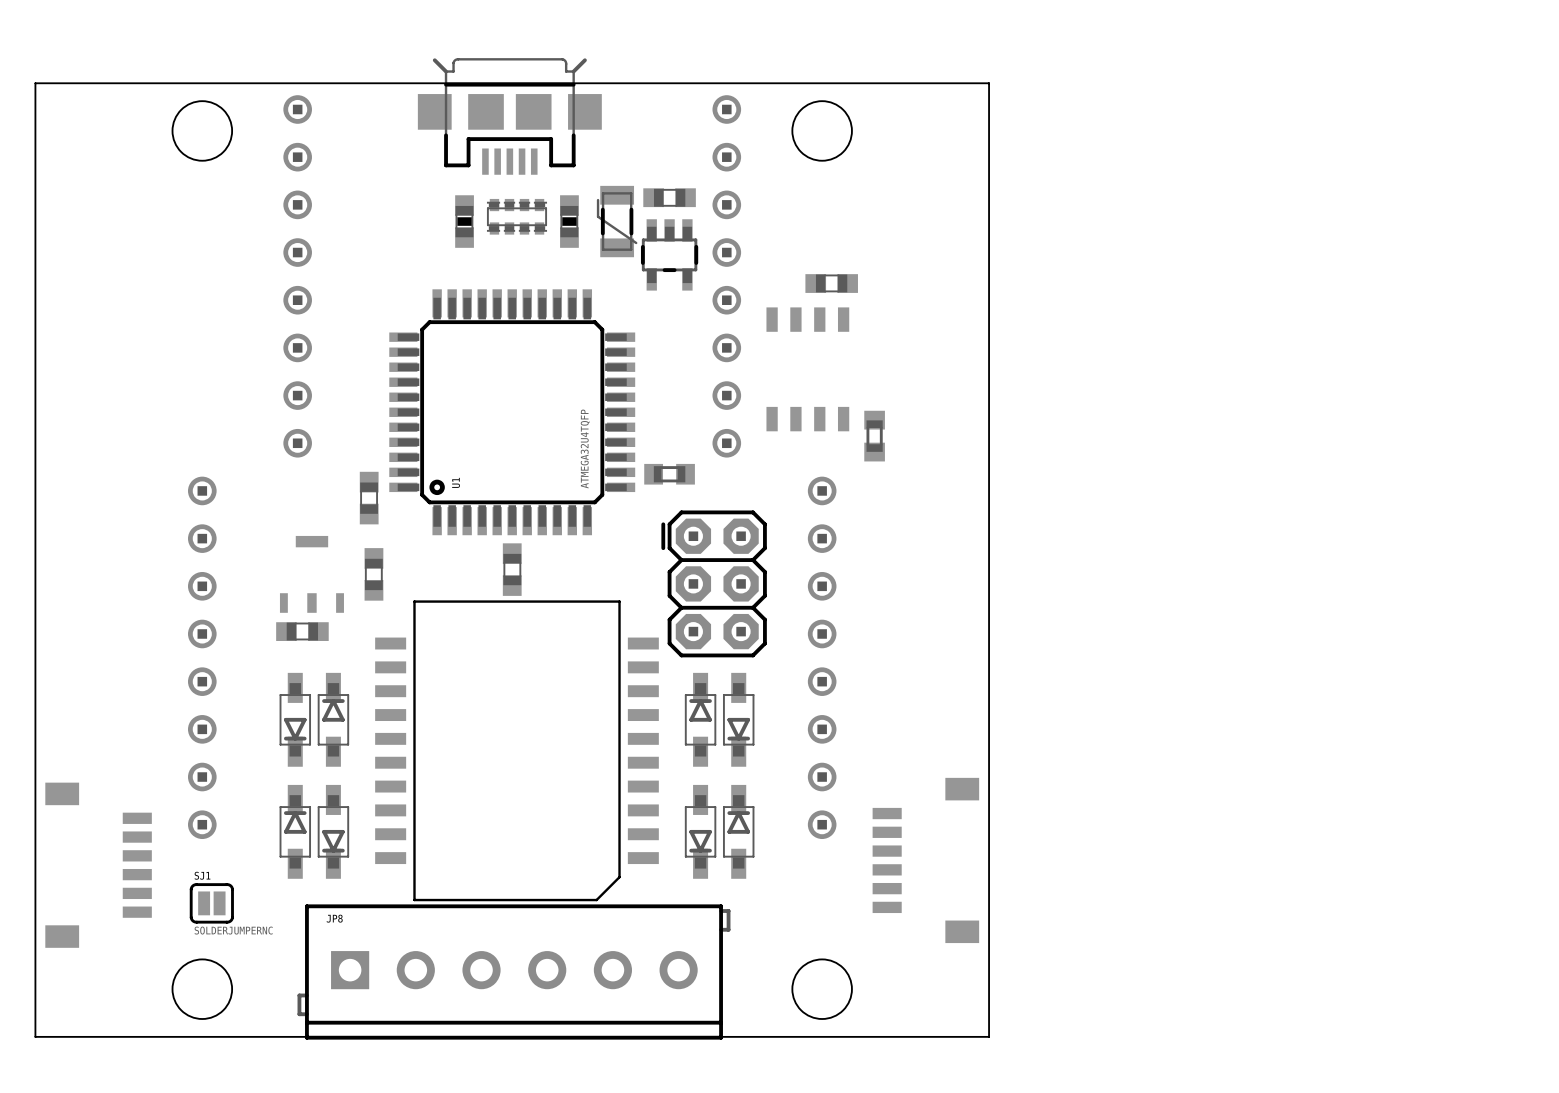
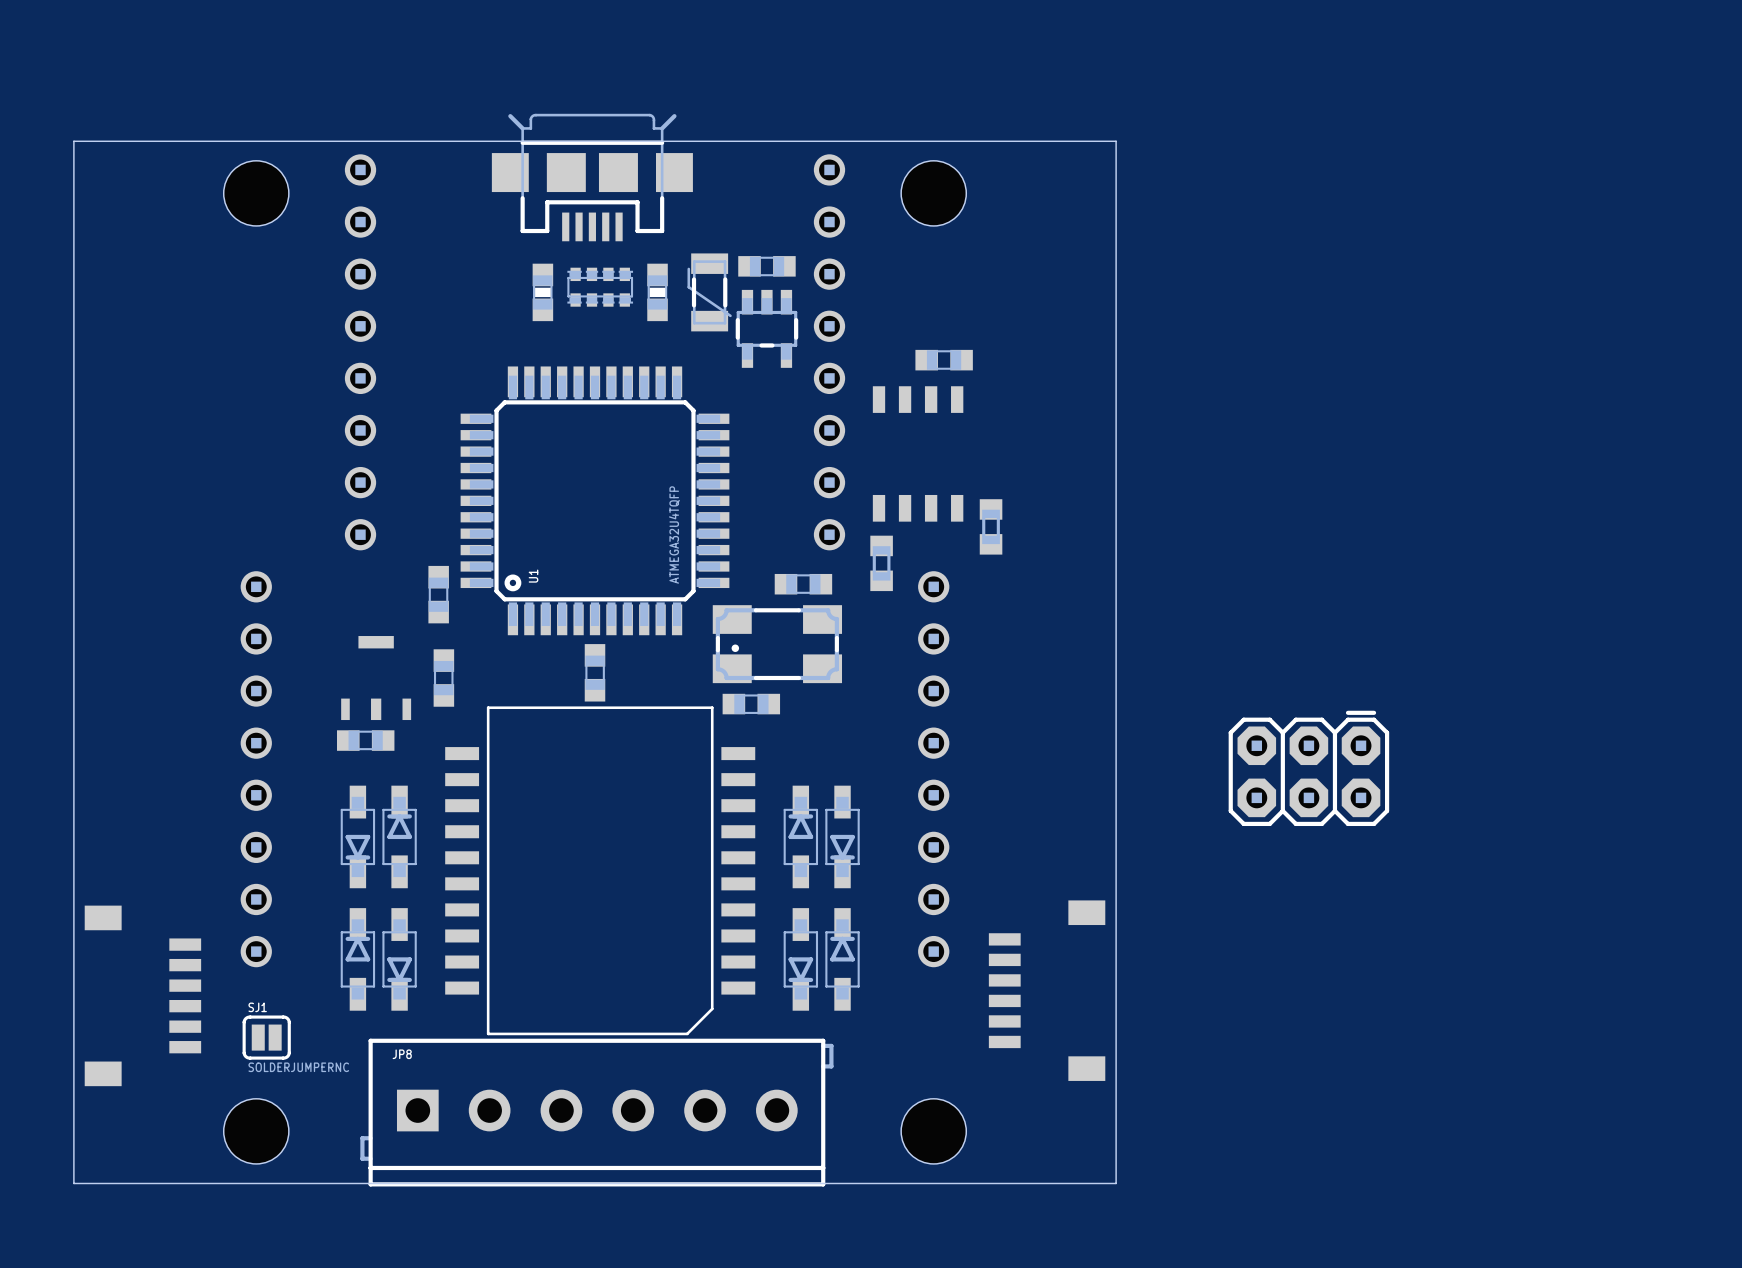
part rotation: 0° (669, 474) -> 90° clockwise (881, 563)
part position: (669, 474) -> (881, 563)
part: none -> (803, 584)
part: none -> (777, 644)
part rotation: 0° (714, 583) -> 90° clockwise (1308, 768)
part position: (714, 583) -> (1308, 768)
part: none -> (751, 704)

